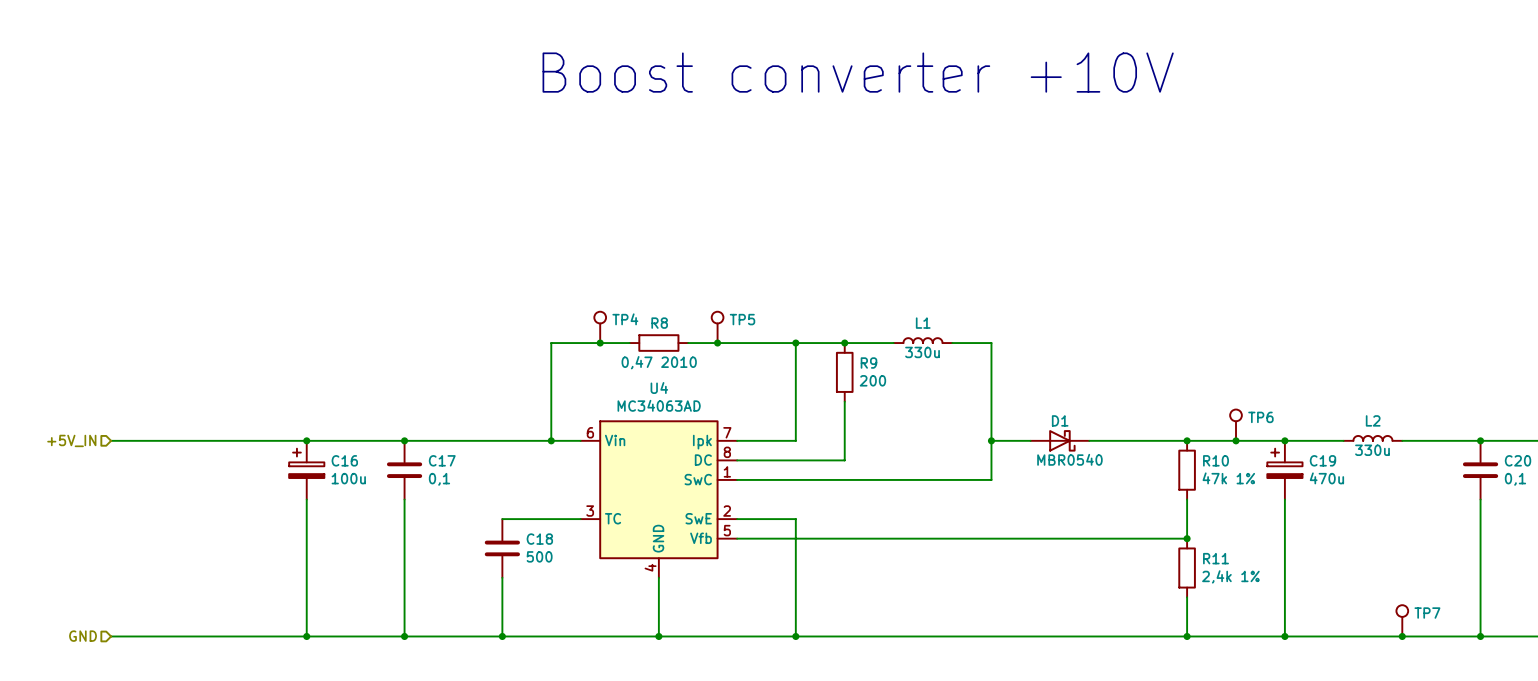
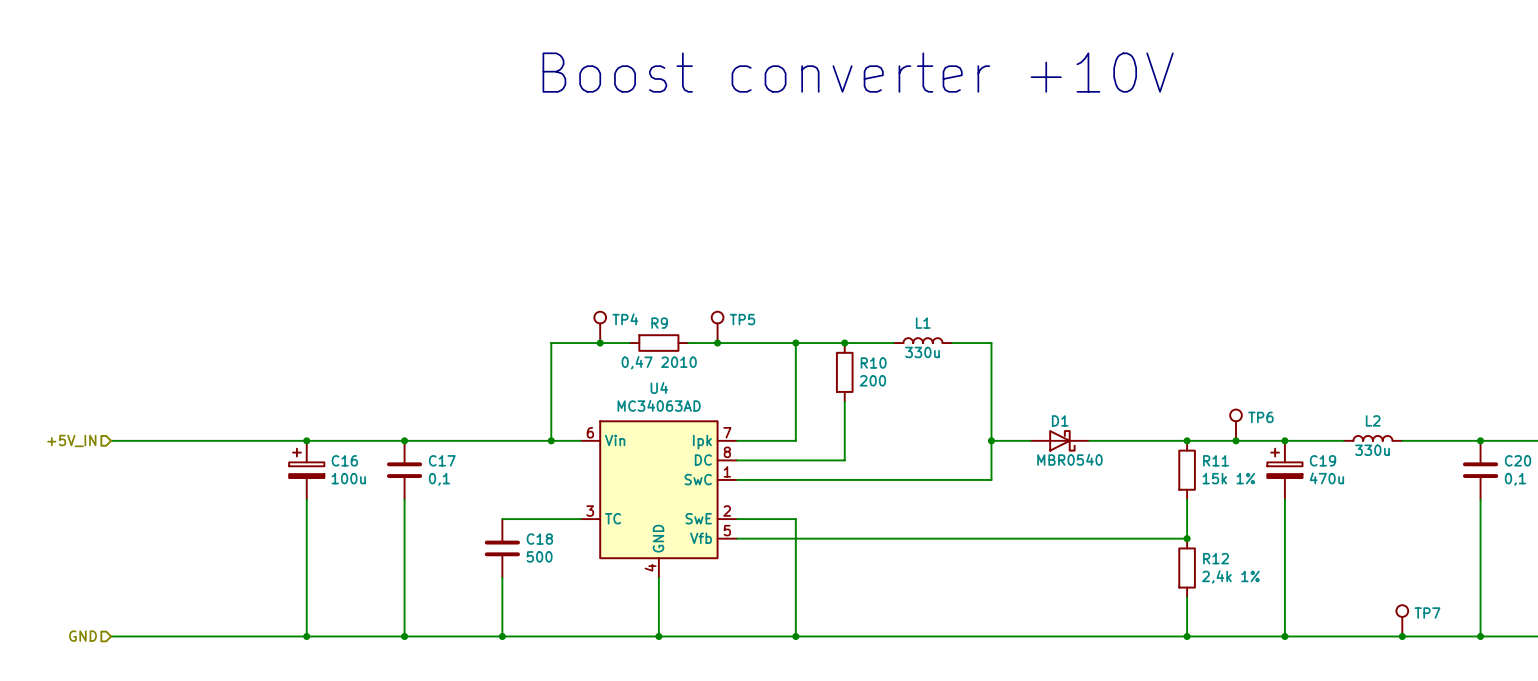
R8 name: R8 (659, 323) -> R9 (659, 323)
R9 name: R9 (868, 363) -> R10 (873, 363)
R10 name: R10 (1216, 460) -> R11 (1216, 460)
R10 value: 47k 1% (1228, 478) -> 15k 1% (1228, 478)
R11 name: R11 (1216, 558) -> R12 (1216, 558)

